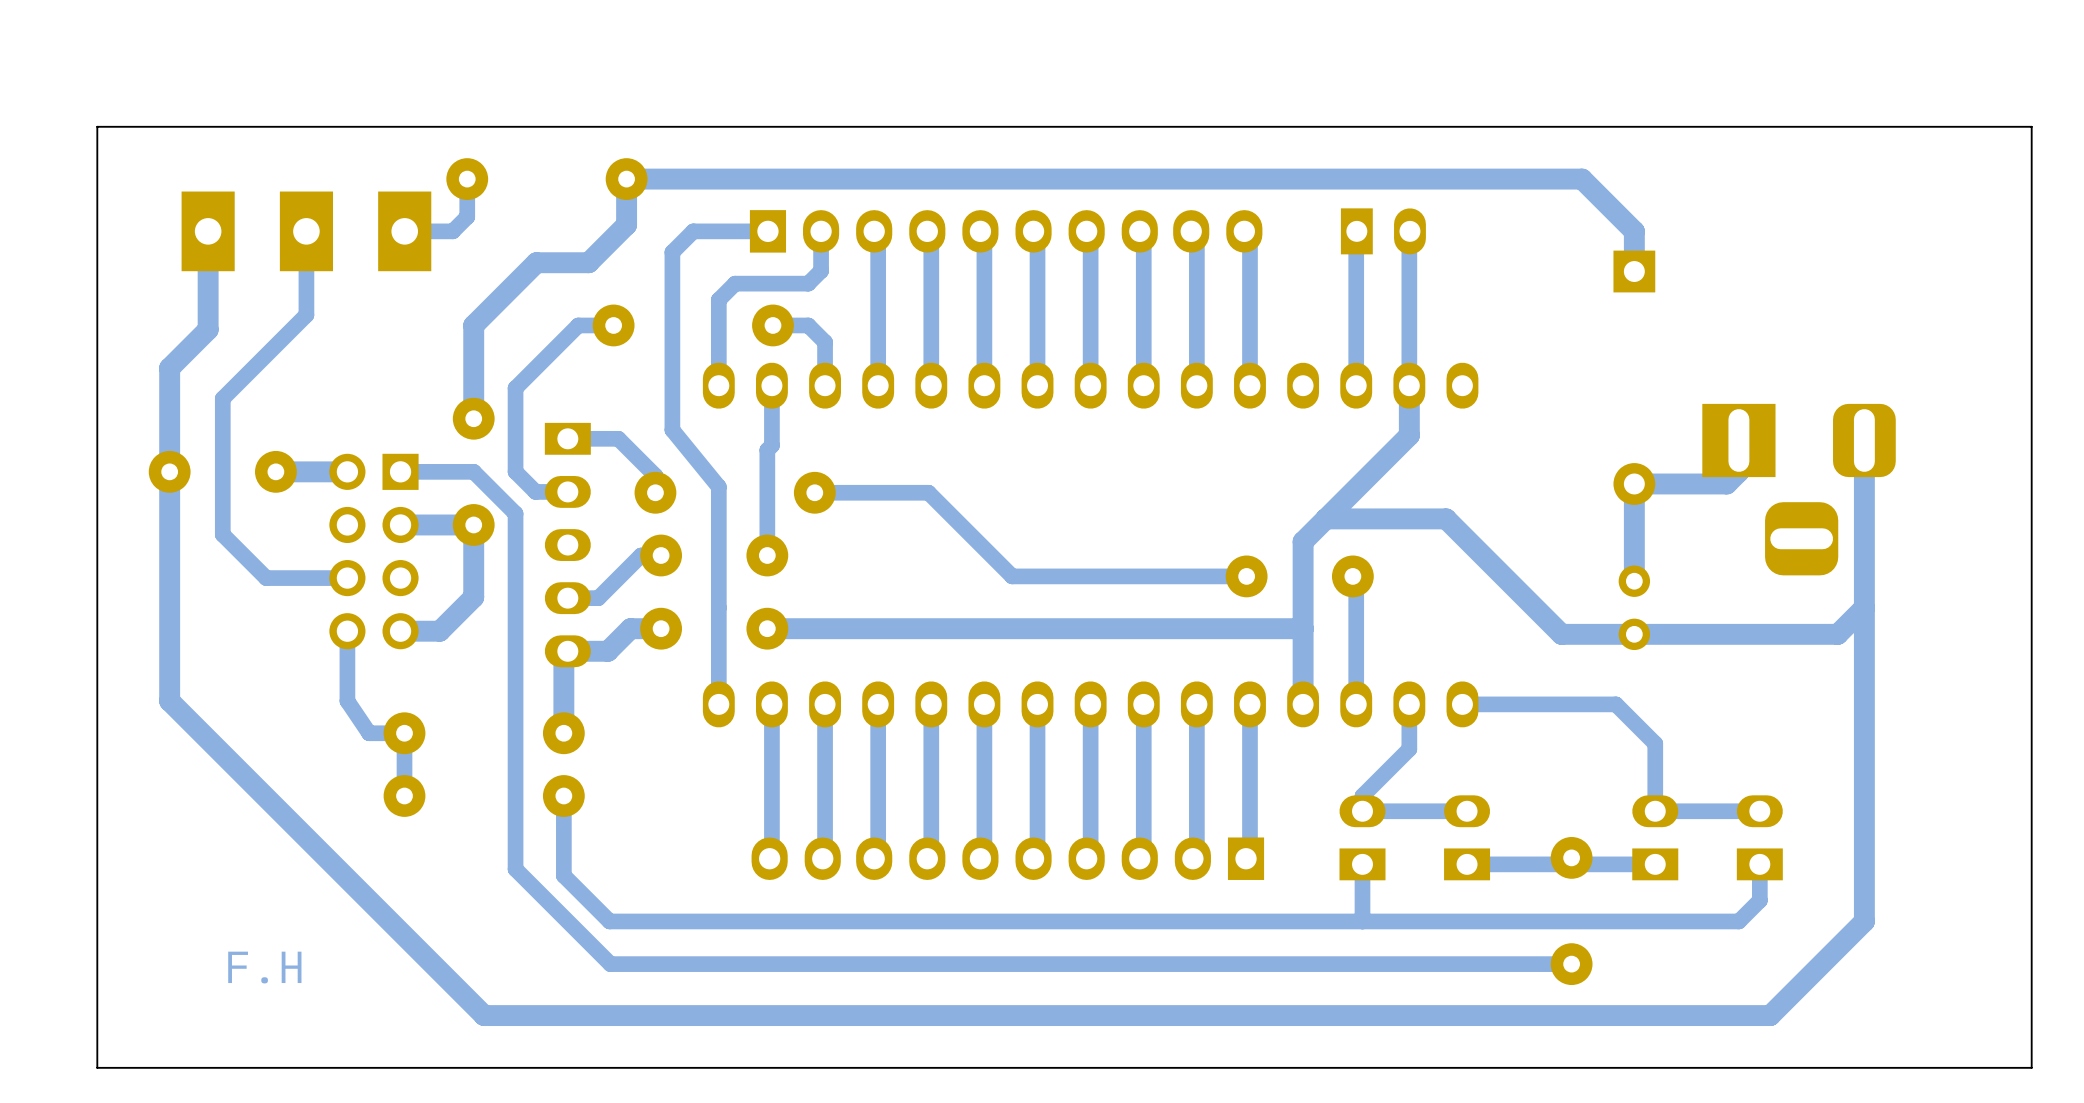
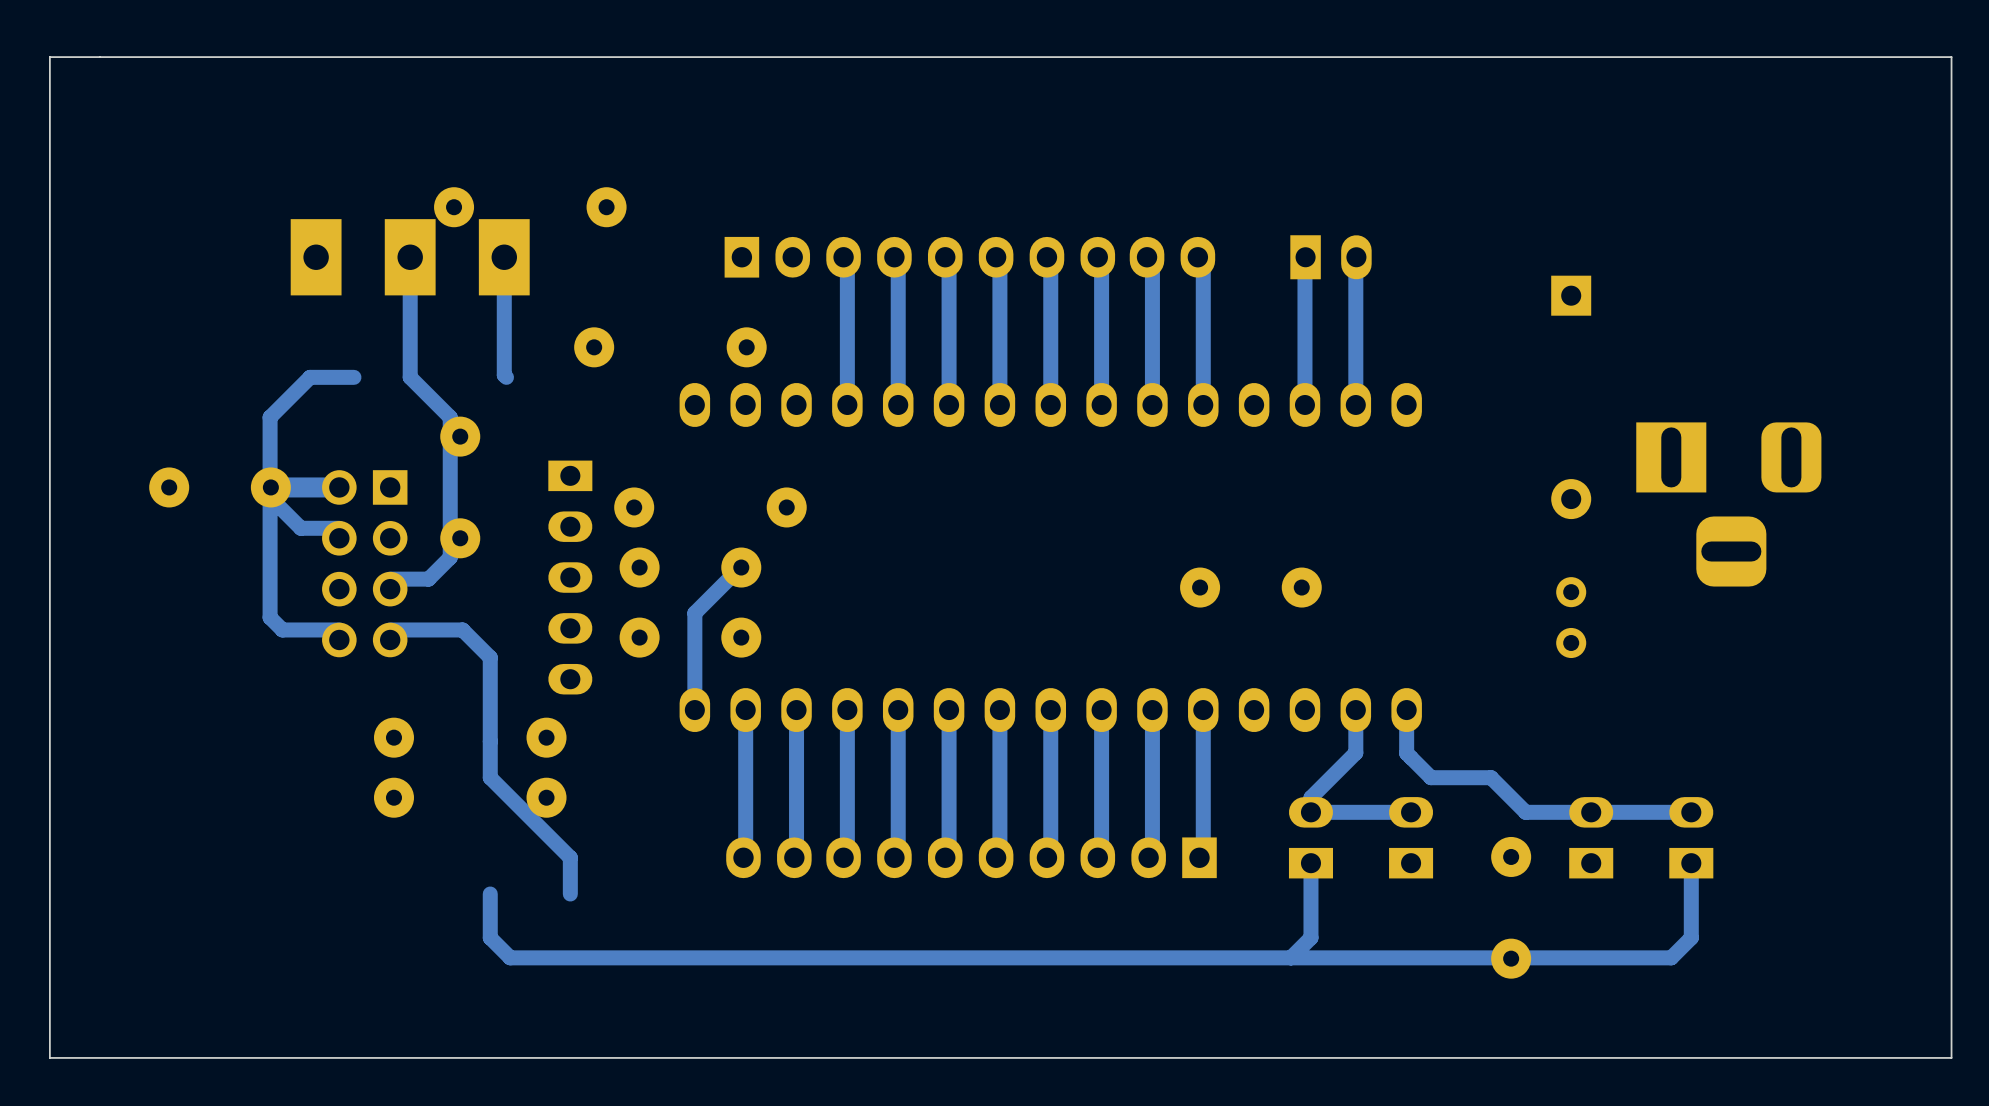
board edge: (2031, 126) (97, 126) (97, 1067) -> (1951, 157) (1951, 57) (49, 57) (49, 1057) (99, 1057)
bottom track: (467, 179) (467, 216) (452, 231) (404, 231) -> none
bottom track: (208, 231) (208, 329) (169, 368) (169, 701) (484, 1015) (1770, 1015) (1864, 921) (1864, 440) -> none
bottom track: (306, 231) (306, 315) (222, 398) (222, 534) (266, 578) (347, 578) -> none
part position: (306, 231) -> (410, 257)
bottom track: none -> (410, 257) (410, 377) (450, 417) (450, 557) (428, 579) (390, 579)
bottom track: none -> (504, 257) (504, 375) (506, 377)
bottom track: (767, 231) (693, 231) (672, 252) (672, 430) (718, 486) (718, 603) -> (730, 577) (694, 613)
bottom track: (821, 231) (821, 270) (808, 283) (735, 283) (718, 299) (718, 385) -> none
bottom track: (1634, 271) (1634, 231) (1582, 179) (626, 179) (626, 224) (588, 262) (536, 262) (473, 325) (473, 418) -> none
bottom track: (613, 325) (578, 325) (515, 388) (515, 471) (535, 491) (567, 491) -> none
bottom track: (772, 325) (808, 325) (825, 342) (825, 385) -> none
bottom track: none -> (353, 377) (310, 377) (270, 417) (270, 617) (282, 629) (339, 629)
bottom track: (771, 385) (771, 445) (767, 450) (767, 555) -> none
bottom track: (1409, 385) (1409, 435) (1303, 541) (1303, 704) -> none
bottom track: (567, 438) (618, 438) (655, 475) (655, 492) -> none
bottom track: (1738, 440) (1738, 471) (1726, 483) (1634, 483) (1634, 581) -> none
bottom track: (400, 471) (473, 471) (515, 513) (515, 869) (610, 964) (1571, 964) -> none
bottom track: none -> (270, 497) (300, 528) (339, 528)
bottom track: (814, 492) (928, 492) (1012, 576) (1246, 576) -> none
bottom track: (1325, 518) (1446, 518) (1561, 634) (1837, 634) (1864, 607) -> none
bottom track: (400, 524) (473, 524) (473, 597) (439, 631) (400, 631) -> none
part position: (567, 545) -> (570, 577)
bottom track: (661, 555) (641, 555) (598, 598) (567, 598) -> none
bottom track: (1352, 576) (1356, 579) (1356, 704) -> none
bottom track: none -> (390, 629) (462, 629) (490, 657) (490, 777) (570, 857) (570, 894)
bottom track: (661, 628) (630, 628) (607, 651) (567, 651) (563, 655) (563, 733) -> none
bottom track: (1303, 628) (767, 628) -> none
bottom track: (347, 631) (347, 701) (369, 733) (404, 733) (404, 795) -> none
bottom track: (1462, 704) (1615, 704) (1655, 743) (1655, 811) -> (1406, 710) (1406, 753) (1431, 777) (1491, 777) (1525, 812) (1591, 812)
bottom track: (563, 795) (563, 875) (609, 921) (1738, 921) (1759, 900) -> (490, 894) (490, 937) (510, 957) (1671, 957) (1691, 937) (1691, 897)
bottom track: (1655, 864) (1467, 864) -> none
bottom track: none -> (1310, 917) (1310, 937) (1290, 957)
text: F.H (264, 967) -> none

